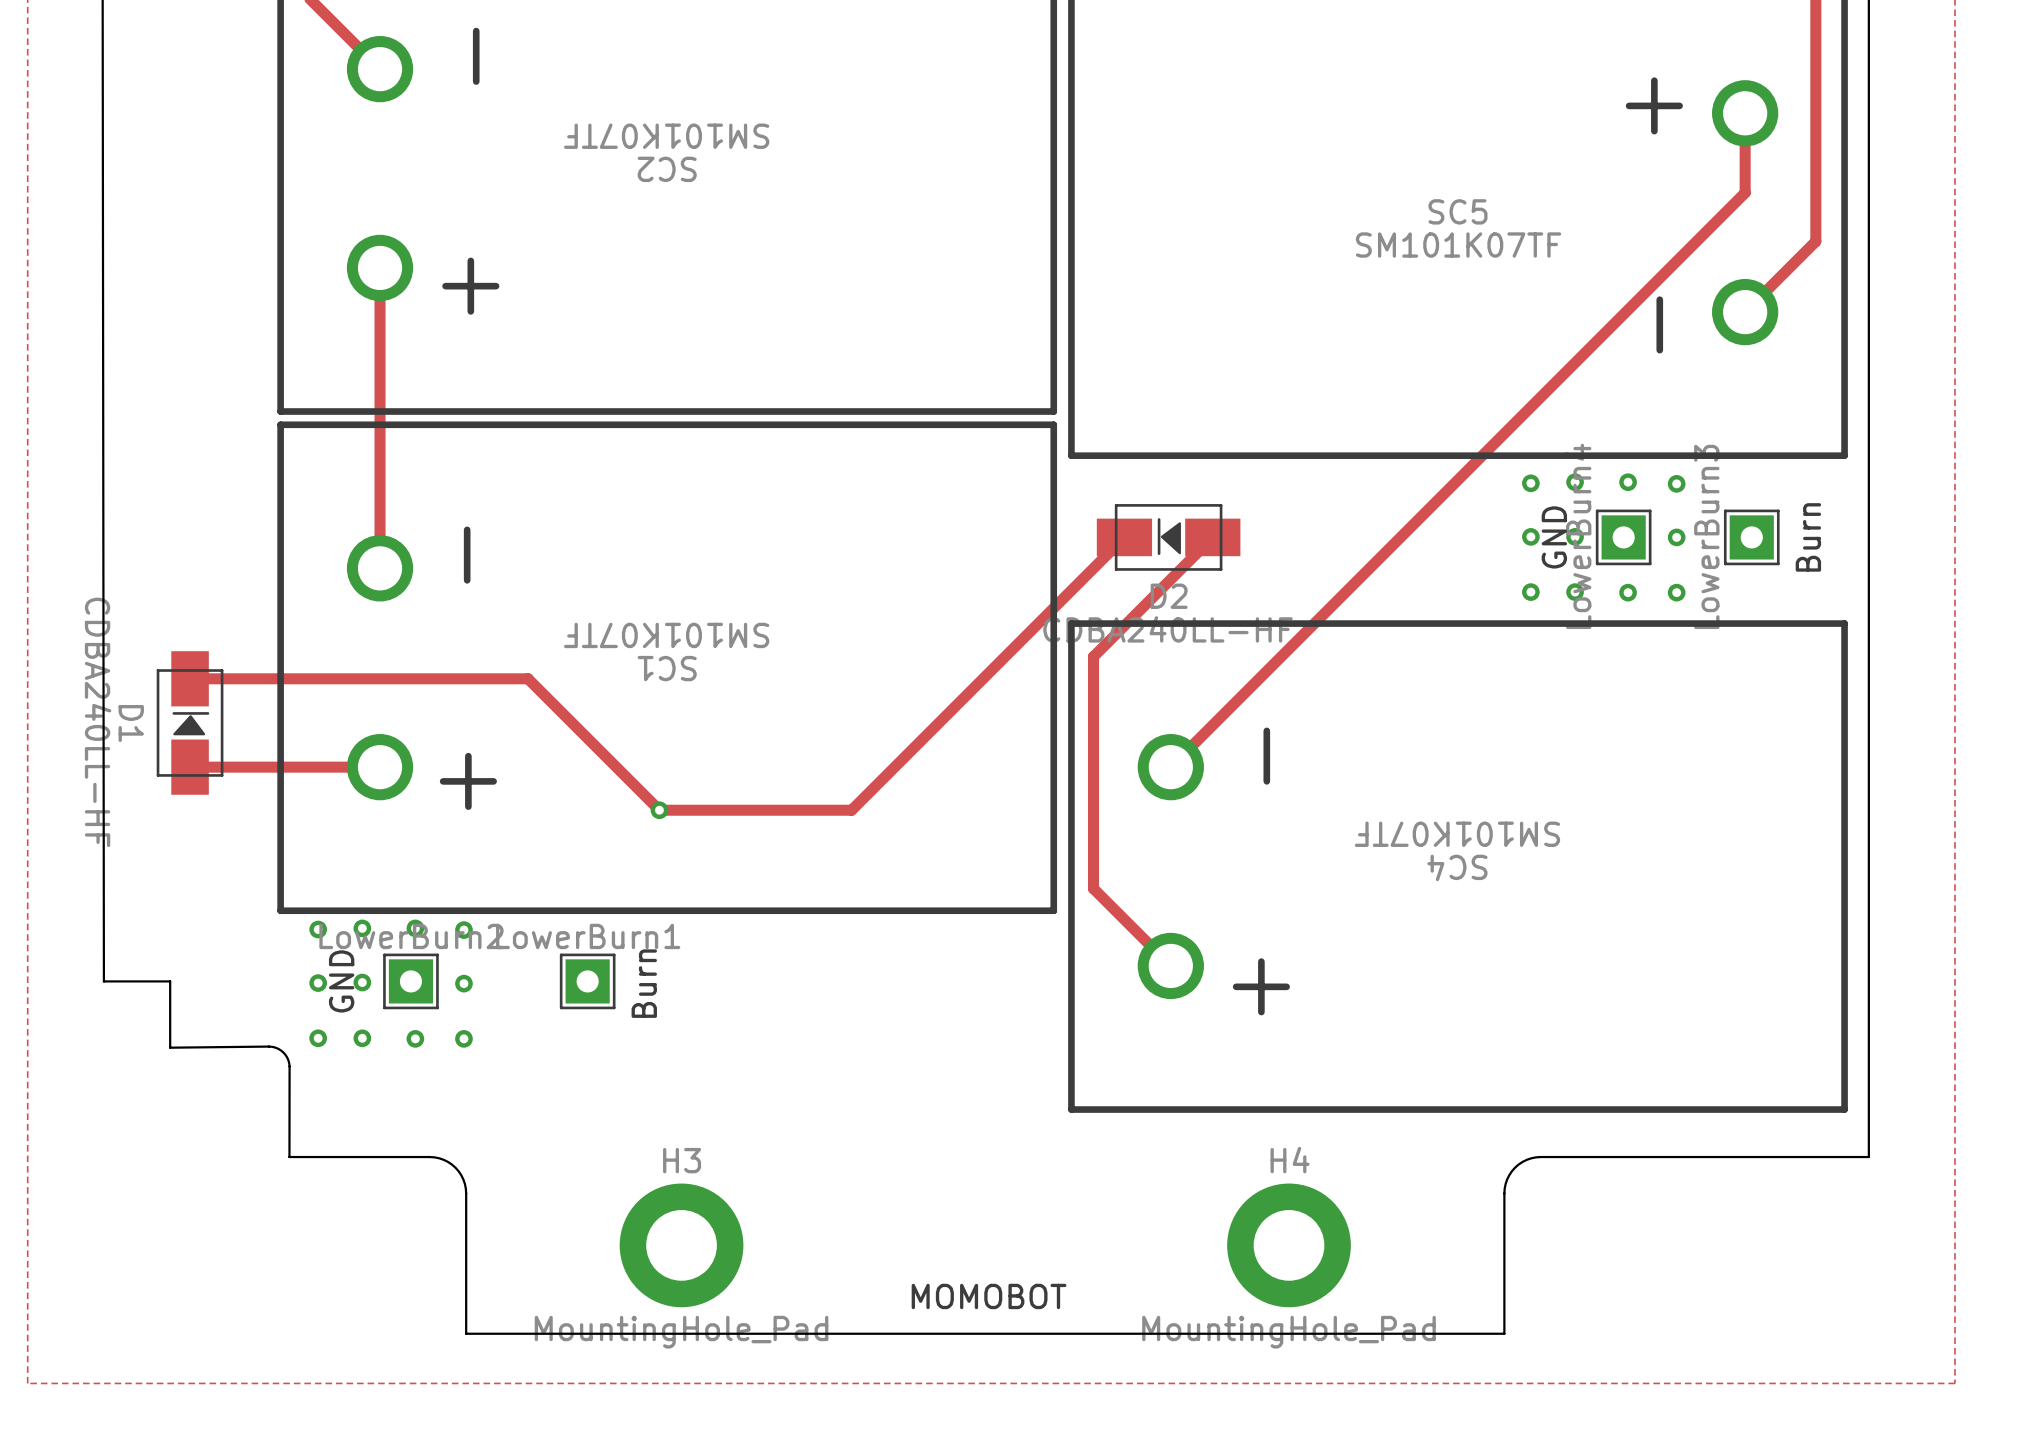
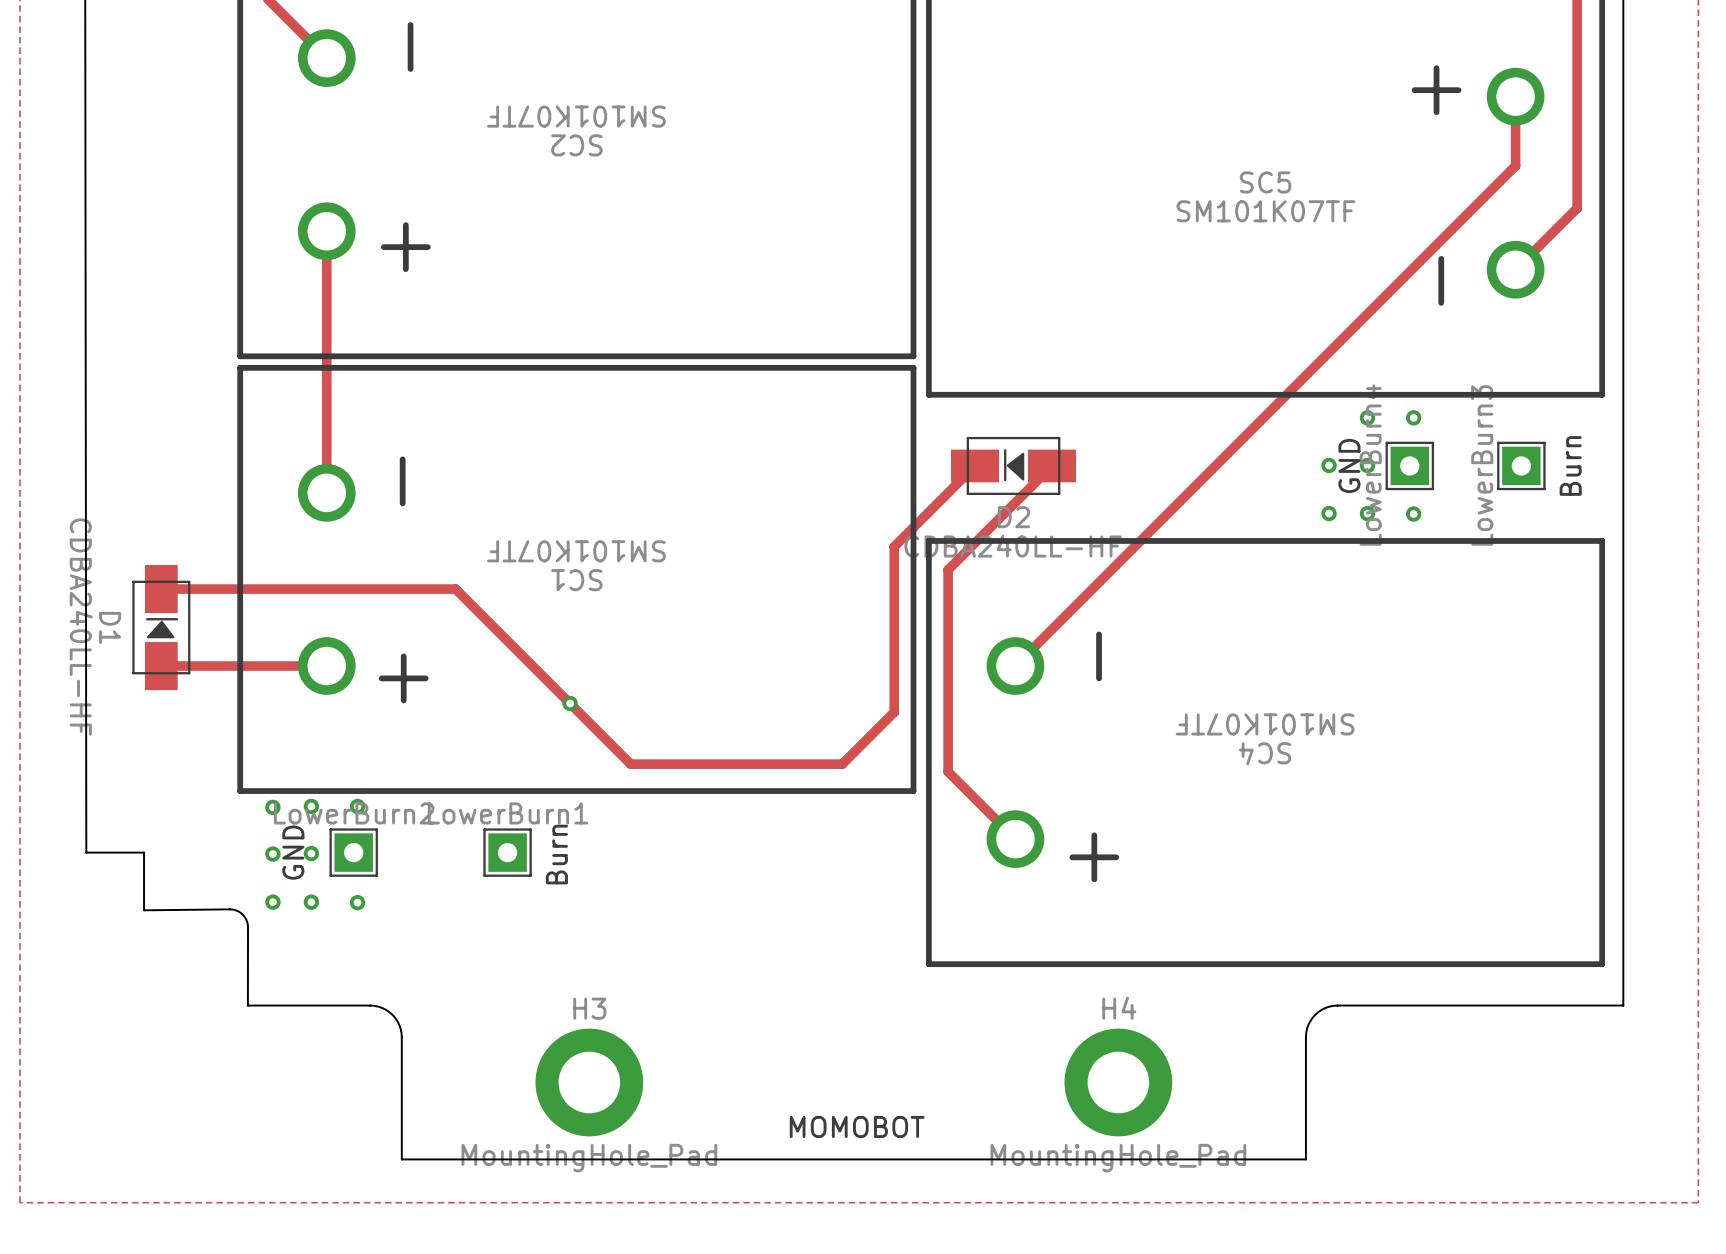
via: (1530, 483) -> none
via: (1676, 483) -> none
via: (1676, 537) -> none
via: (1676, 592) -> none
track: (1031, 630) (851, 810) (659, 810) -> (894, 546) (894, 712) (842, 764) (630, 764) (570, 703)
via: (463, 930) -> none
via: (463, 983) -> none
via: (463, 1038) -> none

